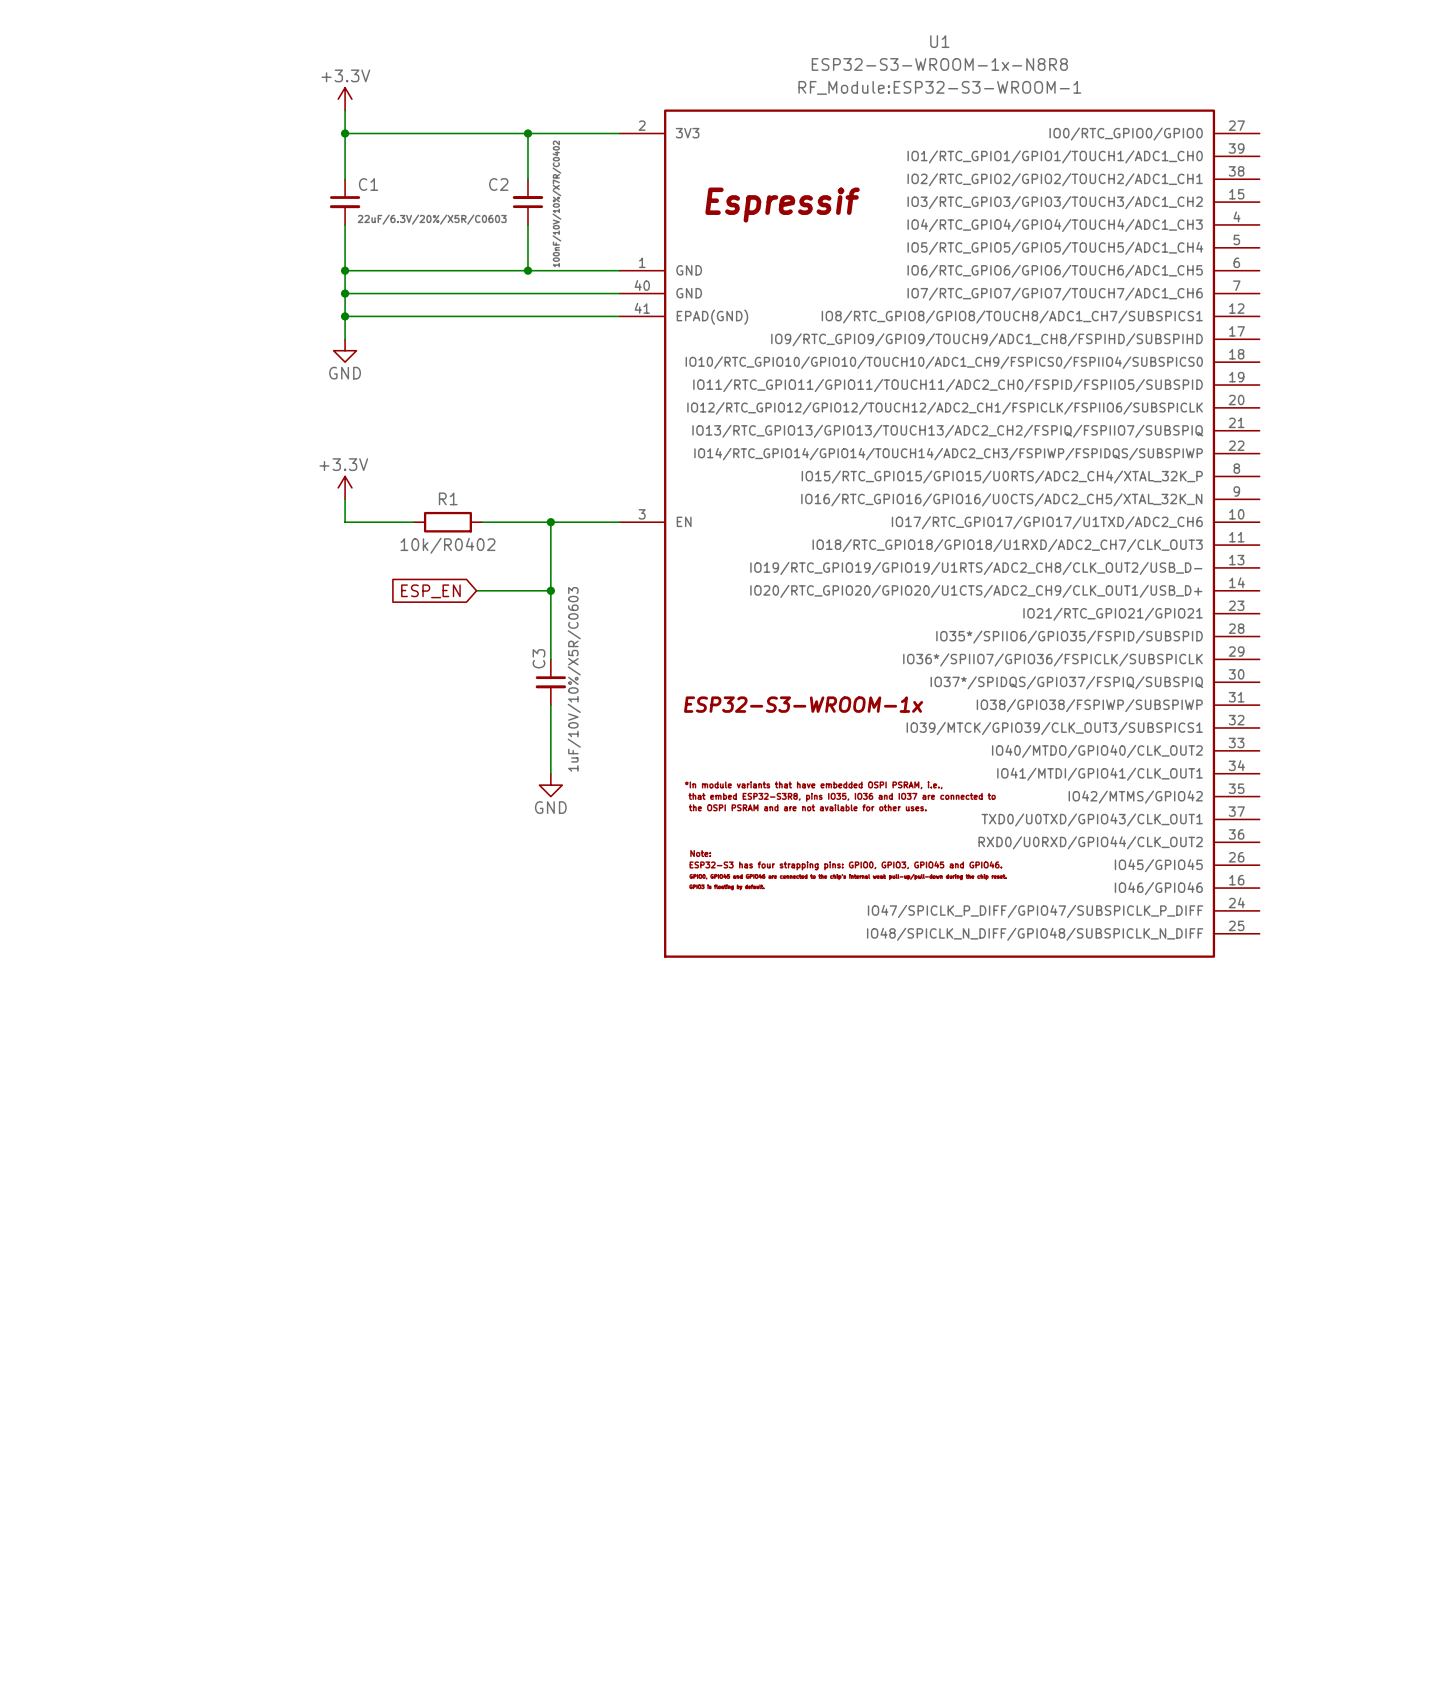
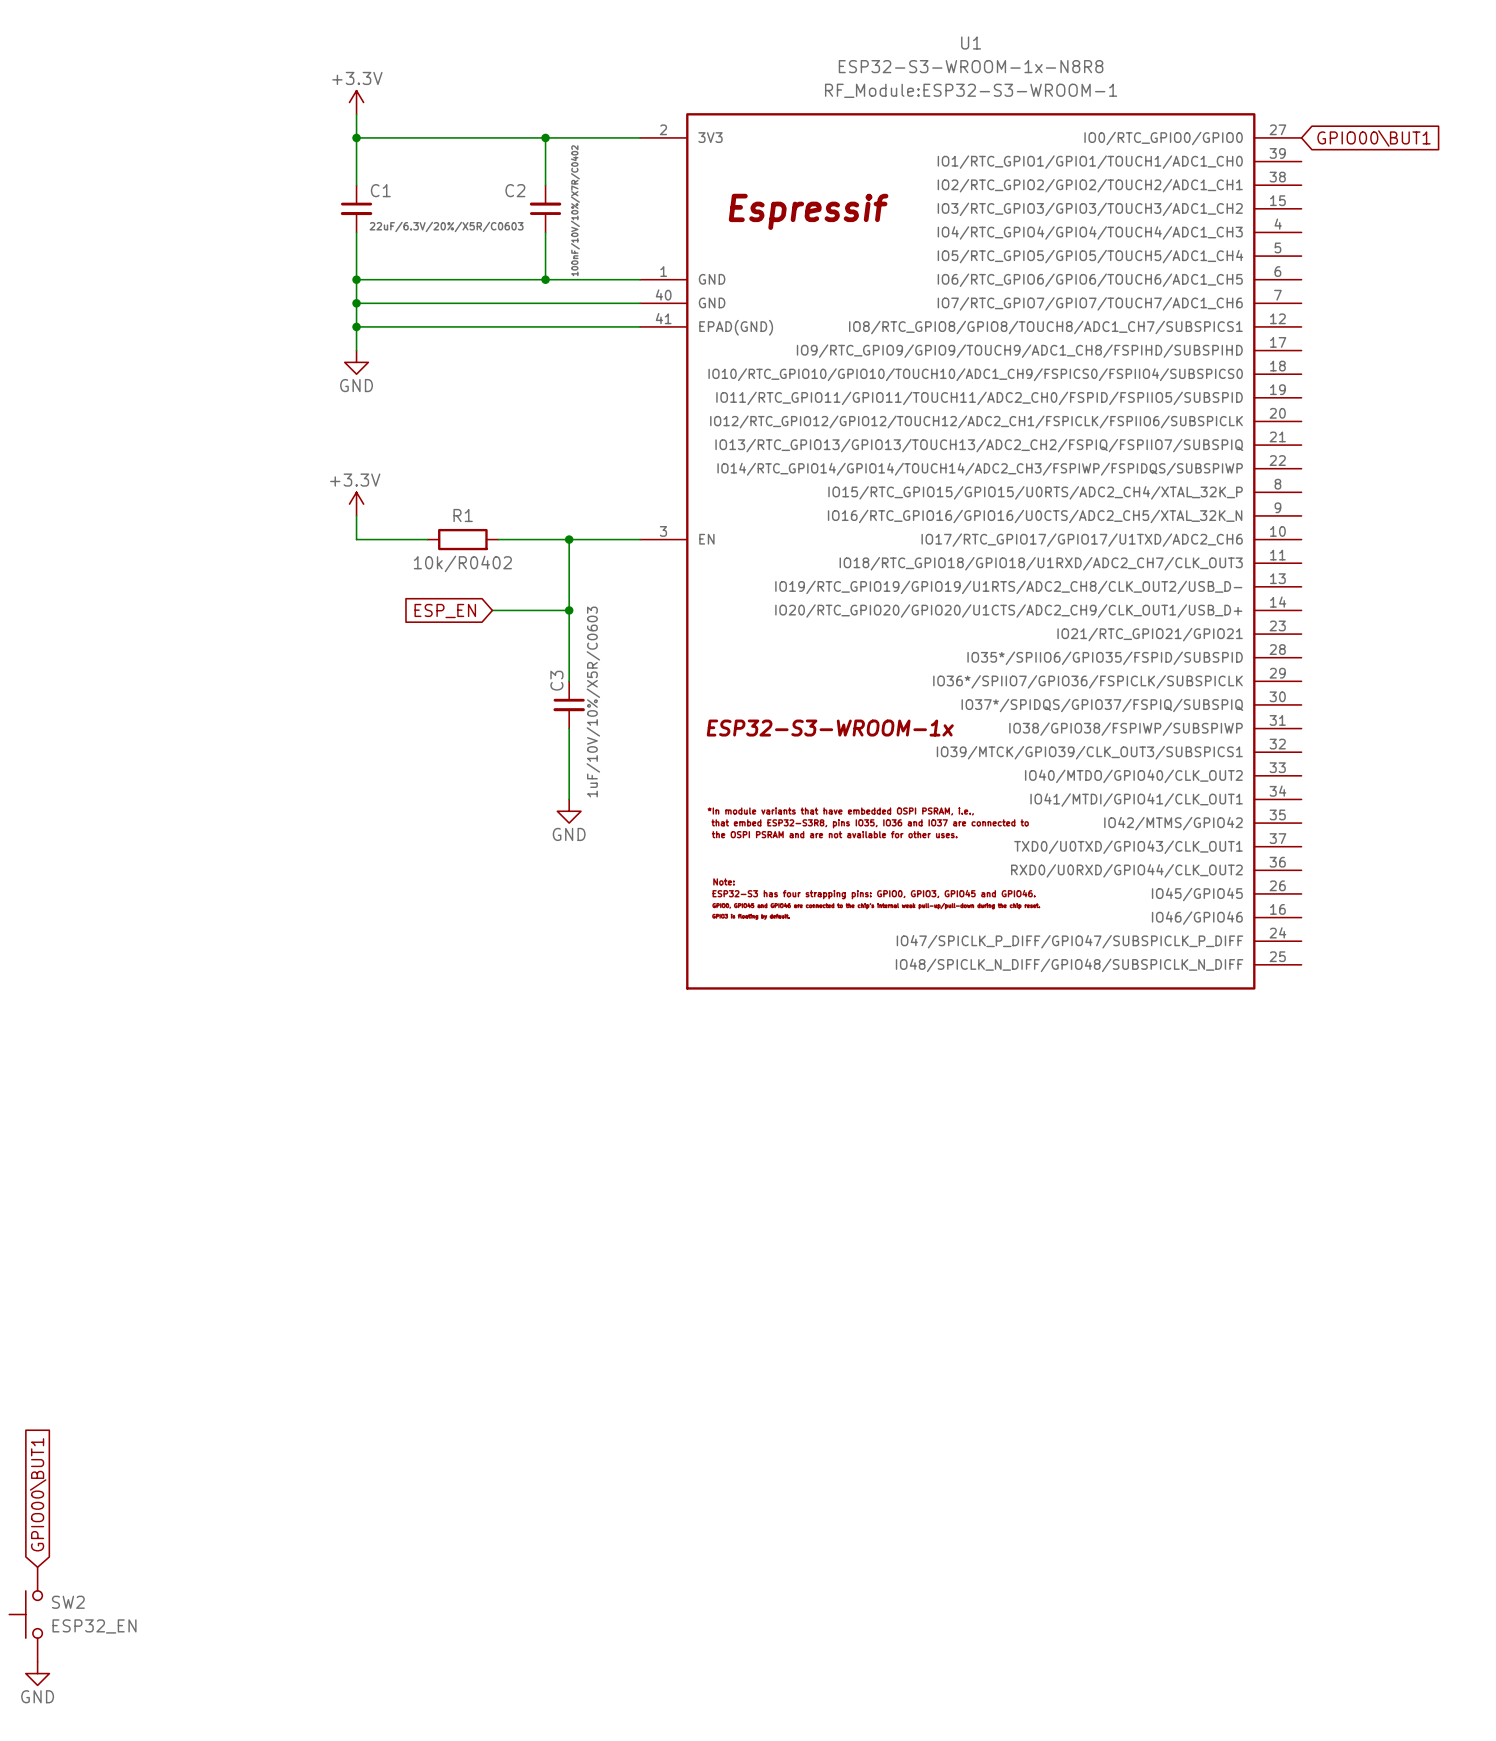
global label: none -> GPIO00\BUT1 (1373, 138)
global label: none -> GPIO00\BUT1 (38, 1494)
SW2: none -> ESP32_EN (25, 1614)
power symbol: none -> GND (37, 1673)

